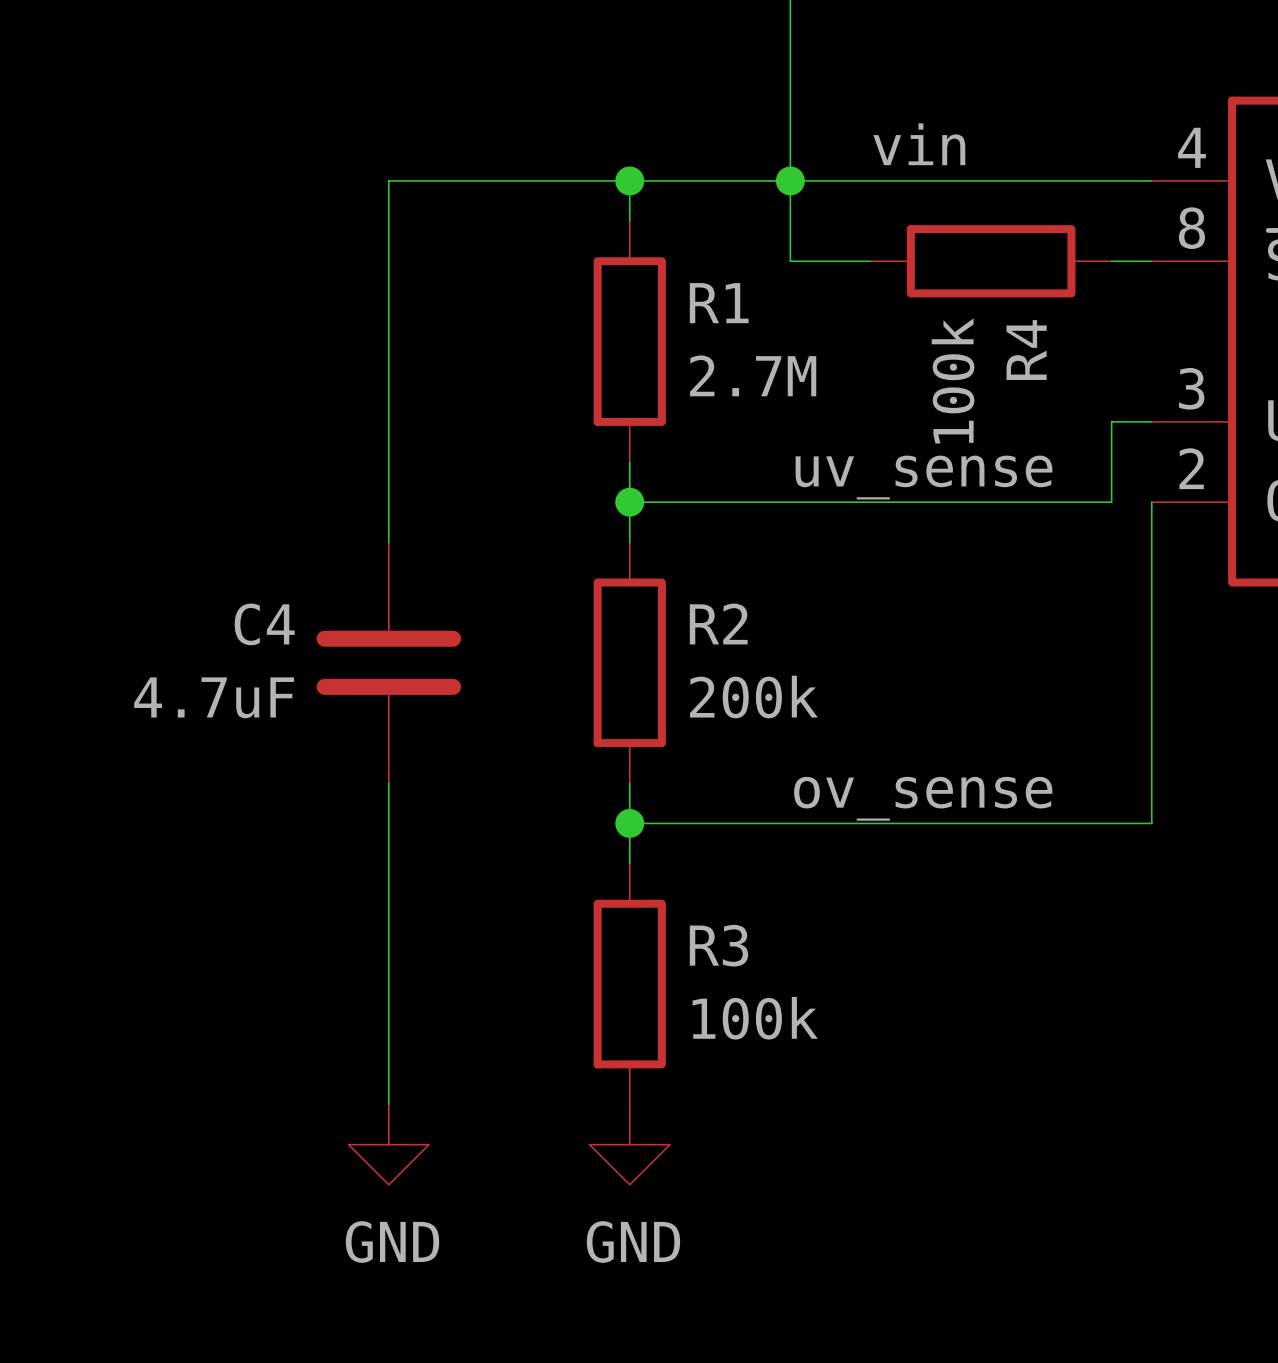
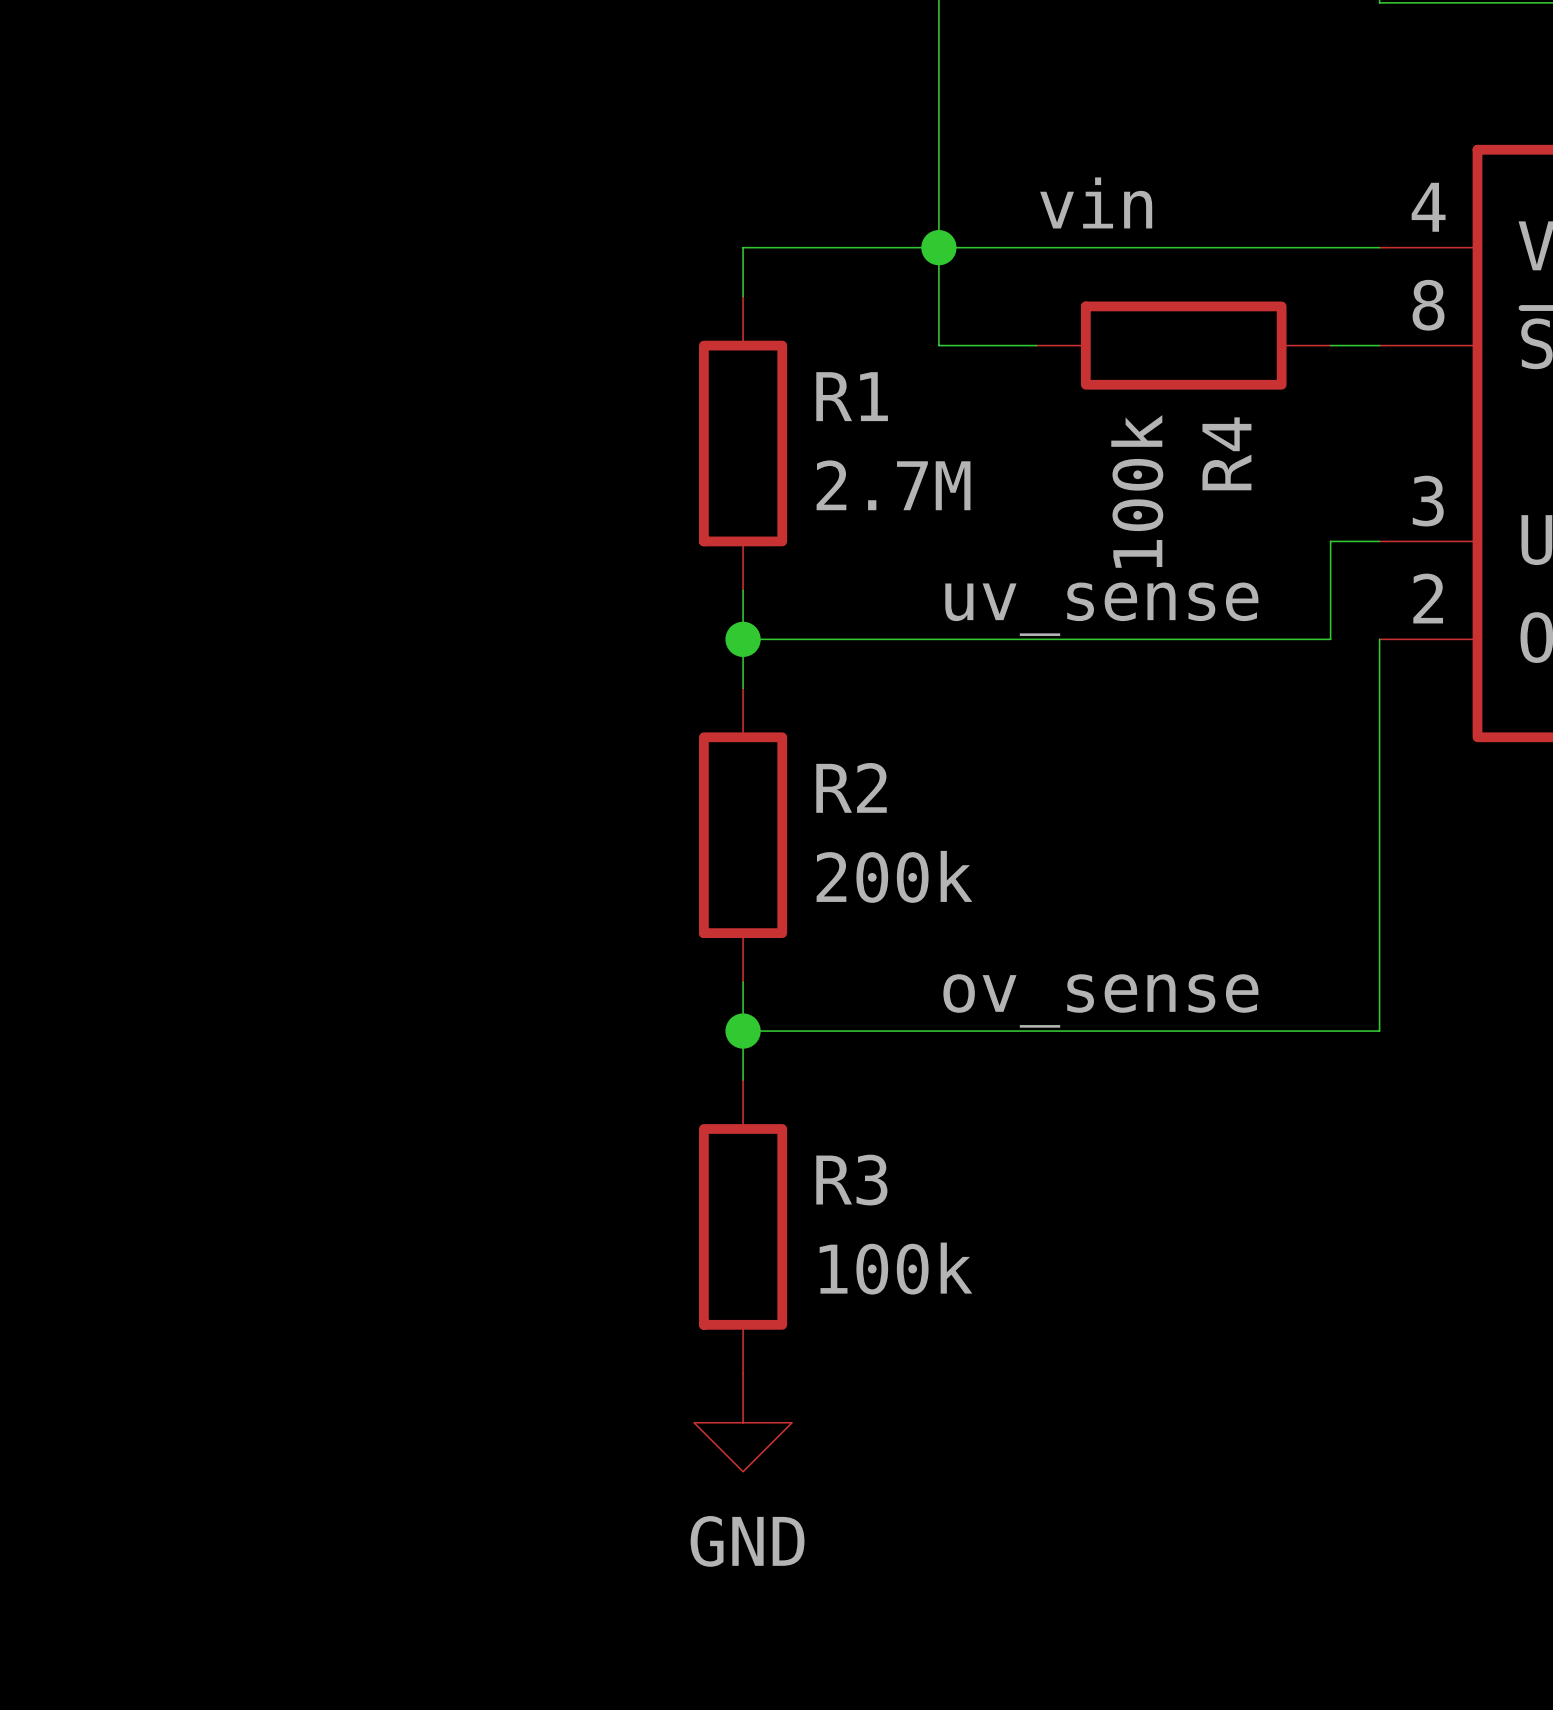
wire: (629, 180) (388, 180) (388, 542) -> none
junction: (629, 180) -> none
C4: 4.7uF (388, 662) -> none
wire: (388, 783) (388, 1104) -> none
power symbol: GND (388, 1144) -> none

